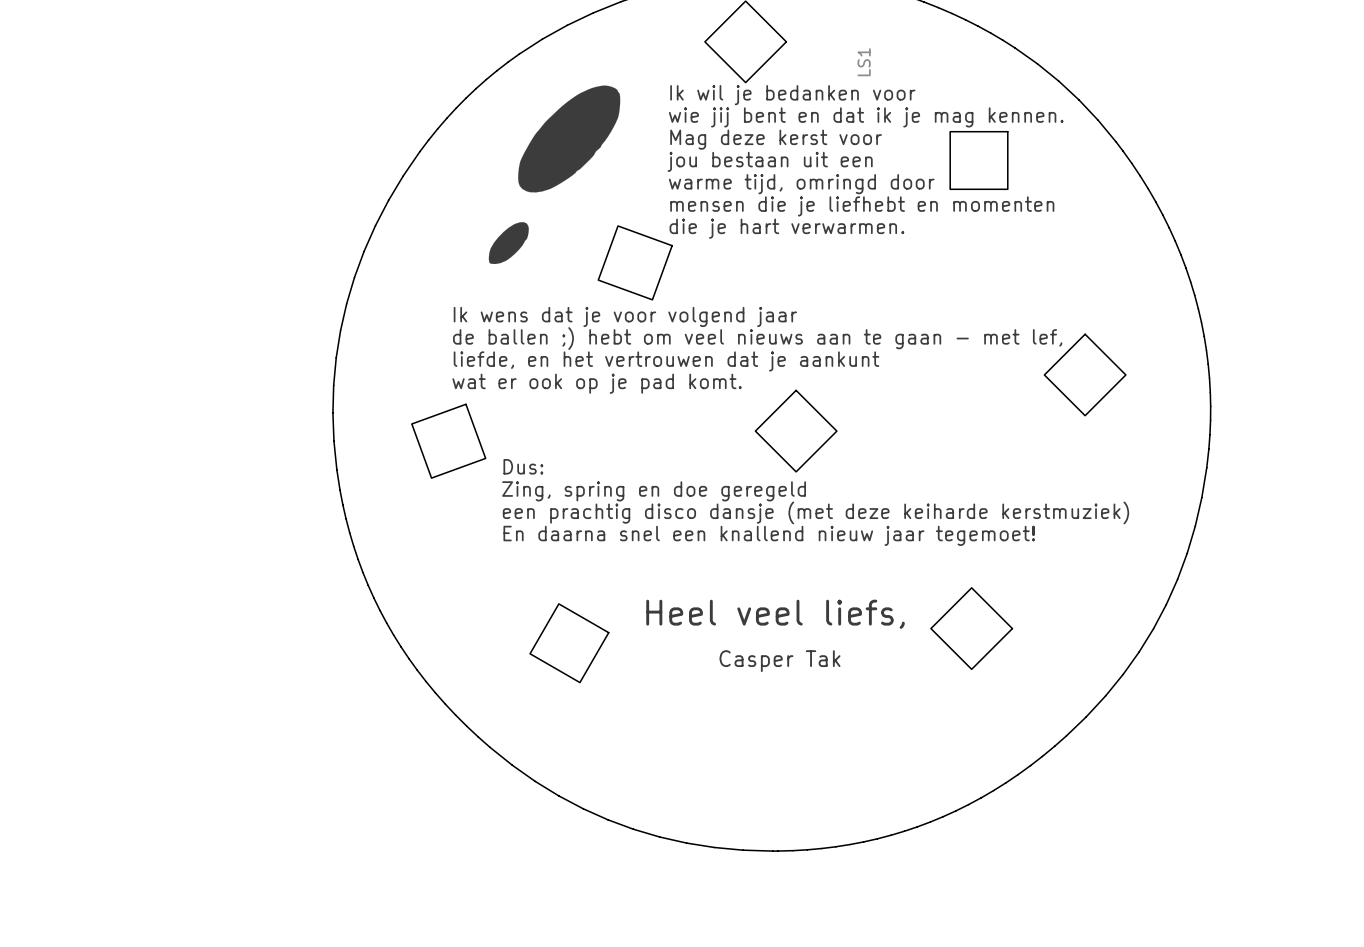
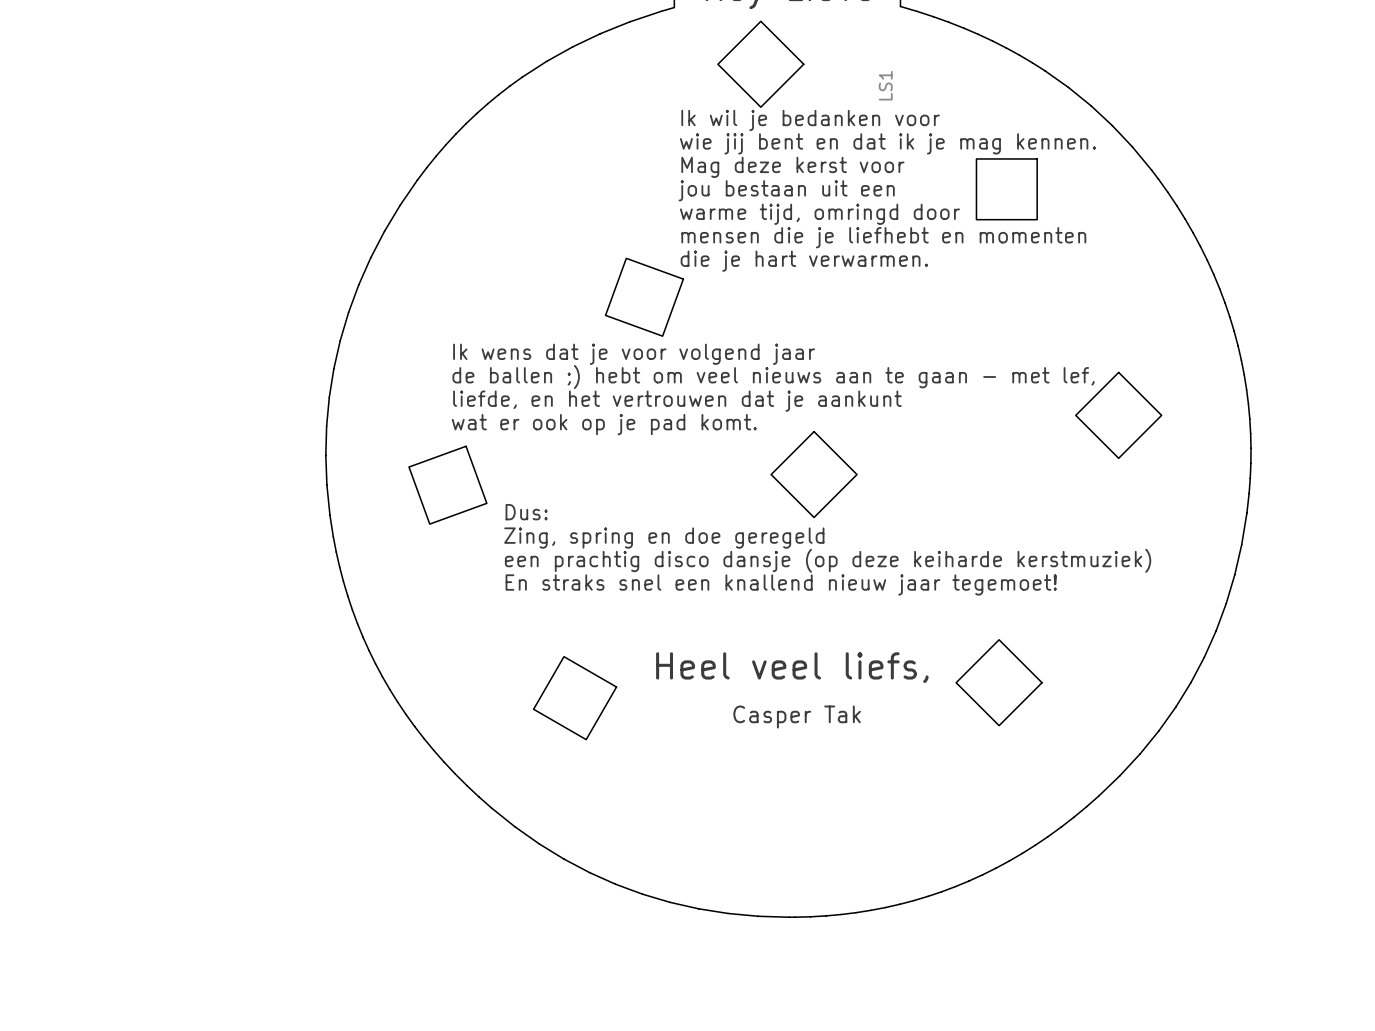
drawing: [488, 85, 621, 265] -> none
text: een prachtig disco dansje (met deze keiharde kerstmuziek) (815, 512) -> een prachtig disco dansje (op deze keiharde kerstmuziek) (828, 560)
text: En daarna snel een knallend nieuw jaar tegemoet! (769, 535) -> En straks snel een knallend nieuw jaar tegemoet! (781, 584)

